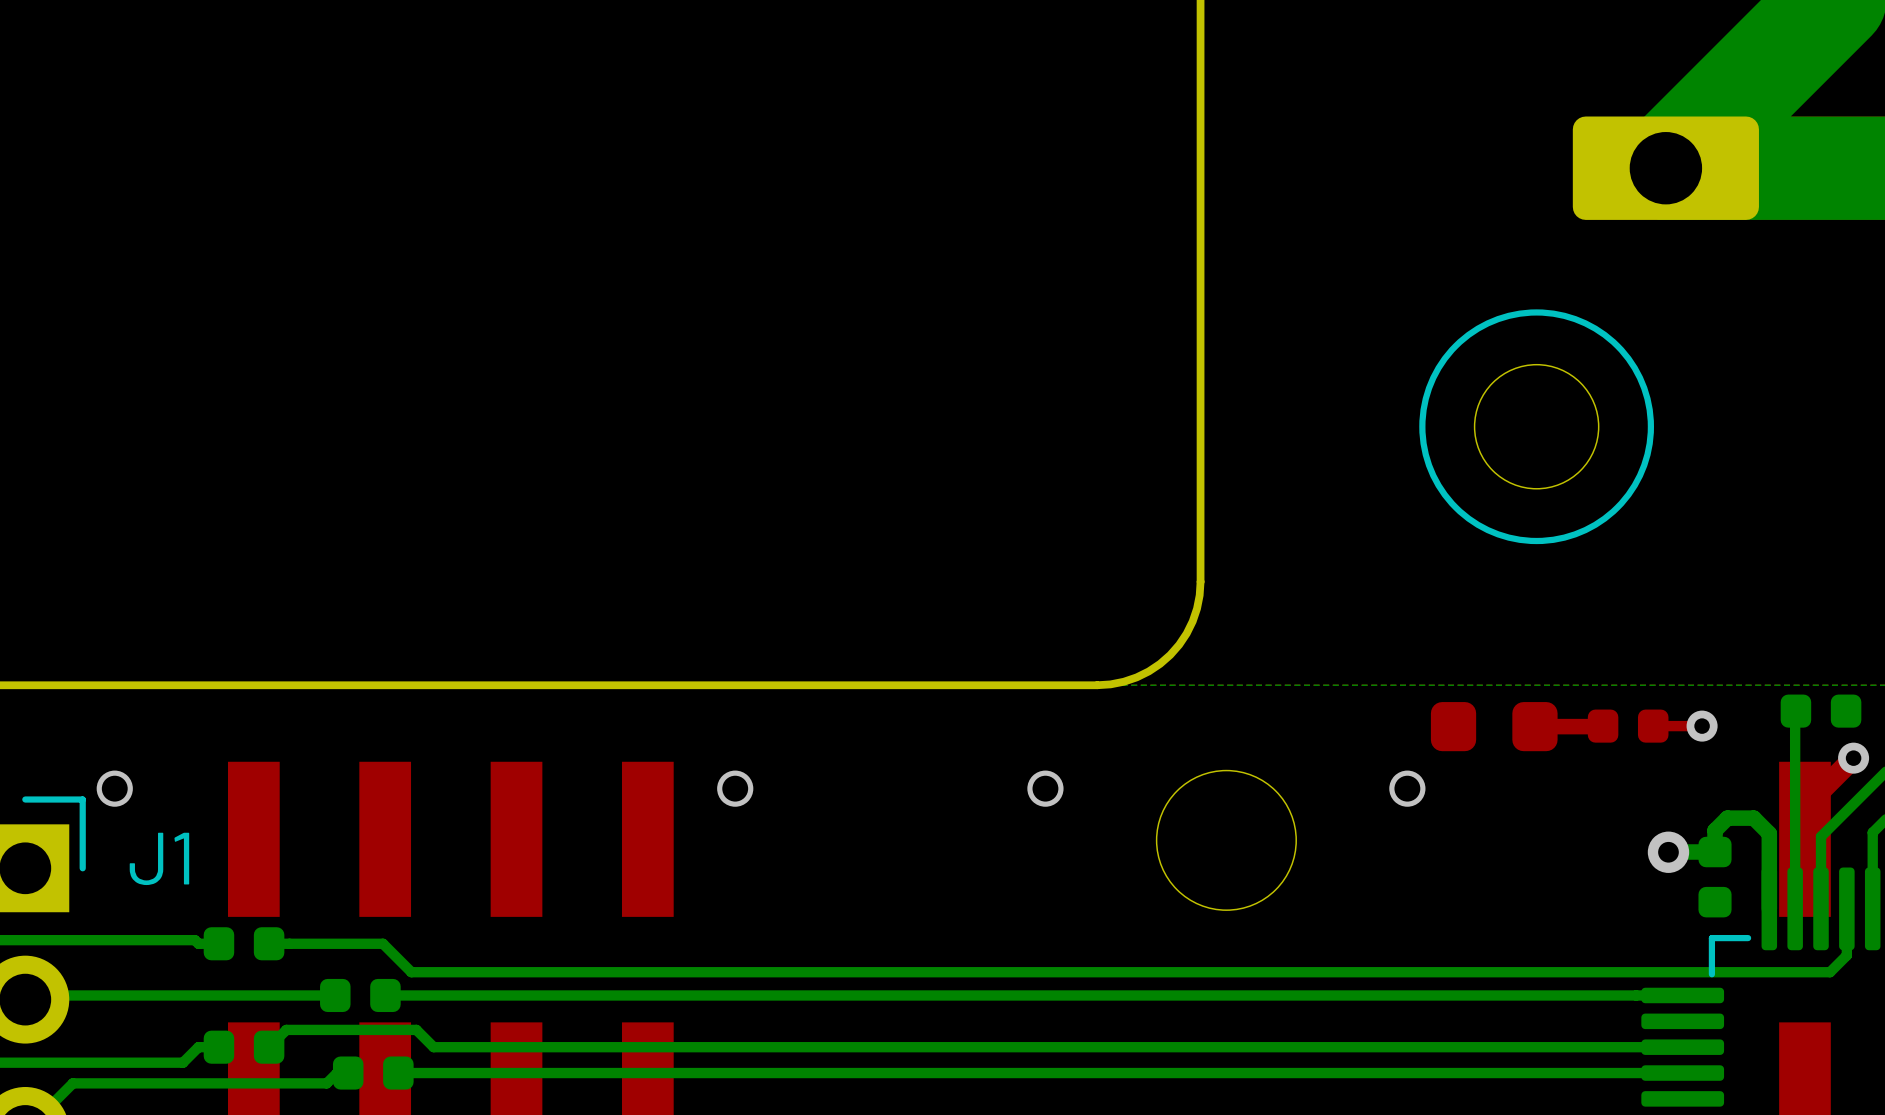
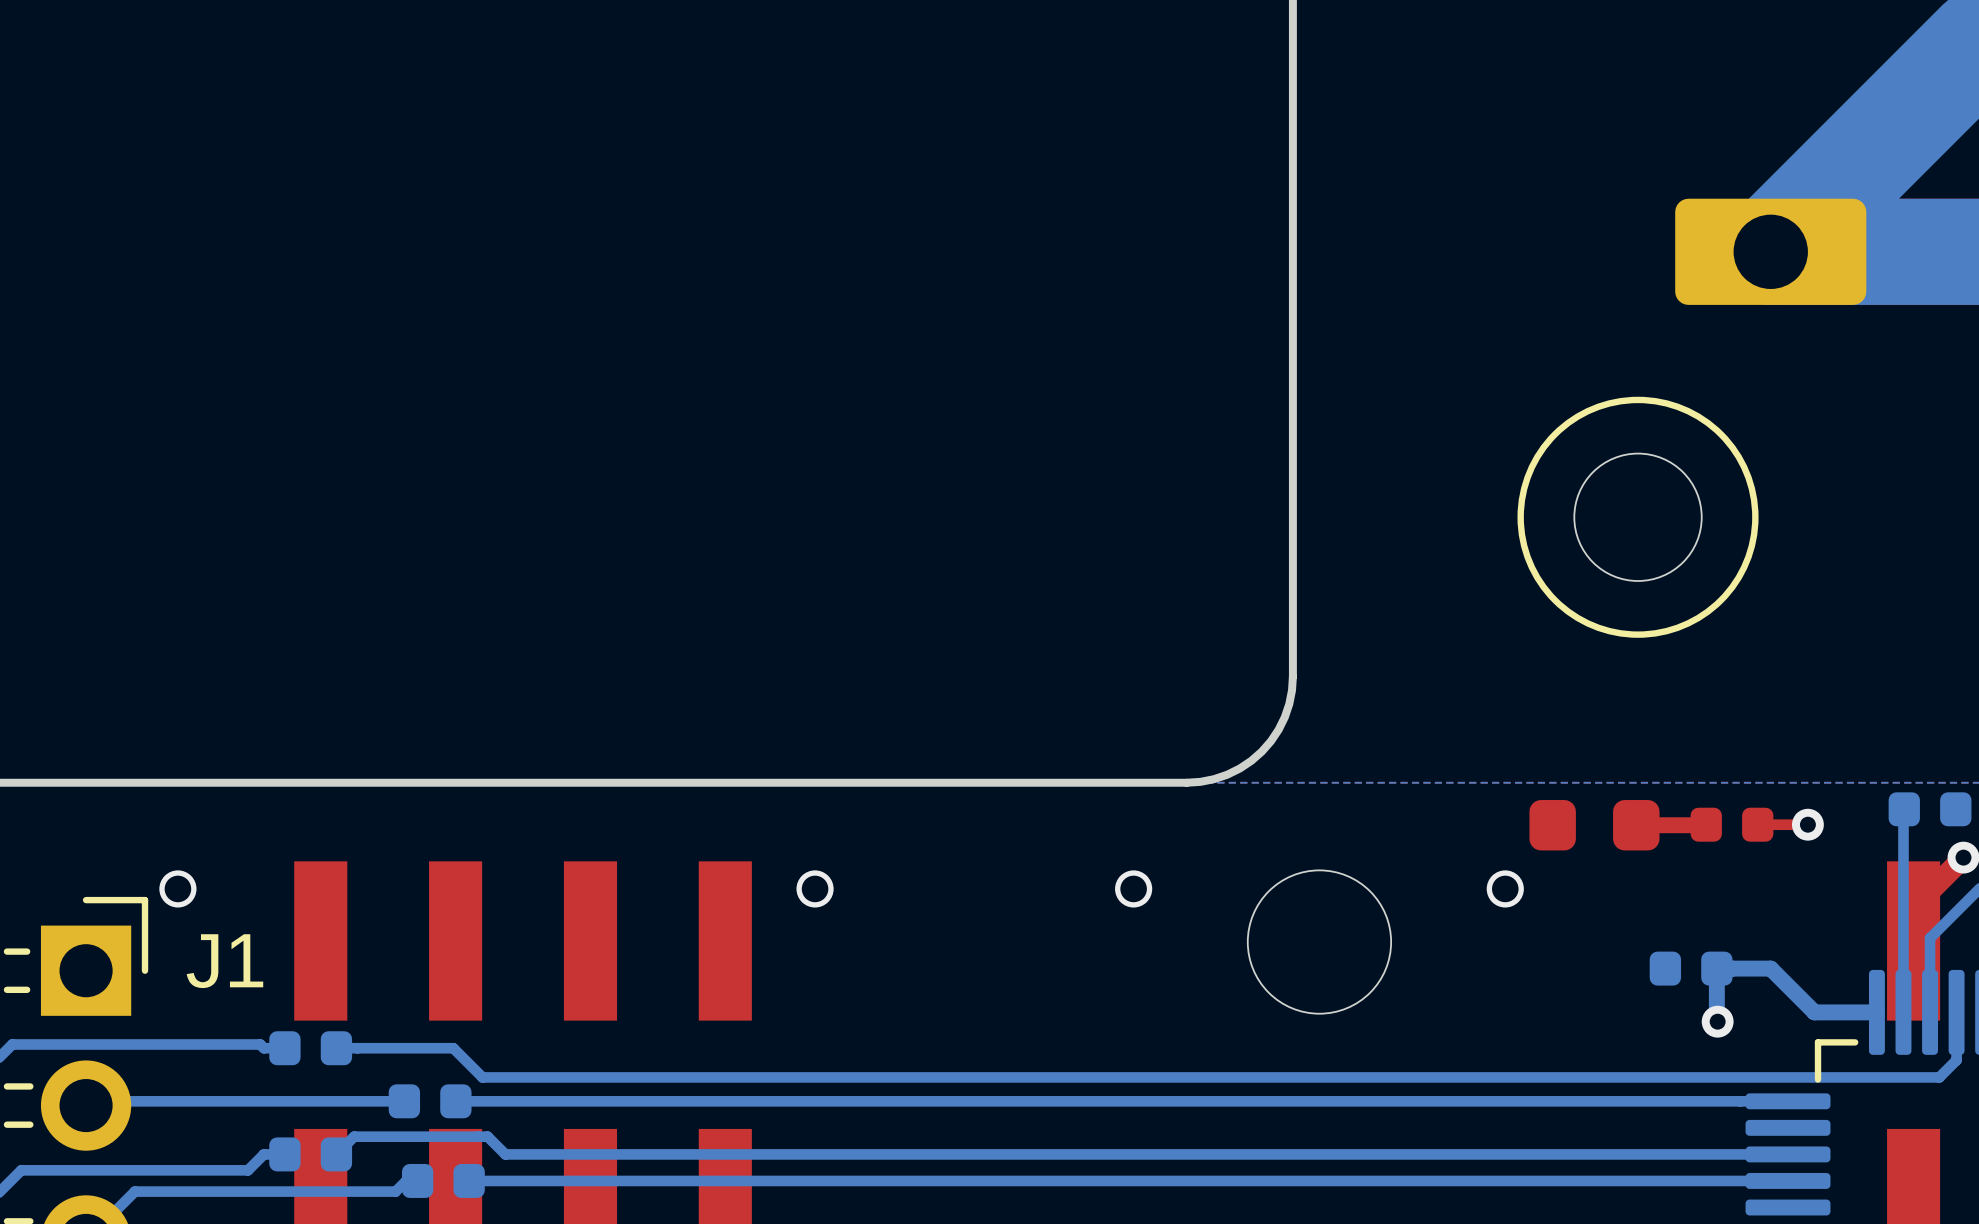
bottom track: (1668, 852) (1715, 852) (1715, 830) (1727, 818) (1753, 818) (1769, 833) (1769, 908) -> (1717, 1021) (1716, 968) (1770, 968) (1814, 1012) (1876, 1012)
via: (1668, 852) -> none
part rotation: 0° (1715, 877) -> 90° clockwise (1691, 968)
part position: (1715, 877) -> (1691, 968)
via: none -> (1717, 1021)

